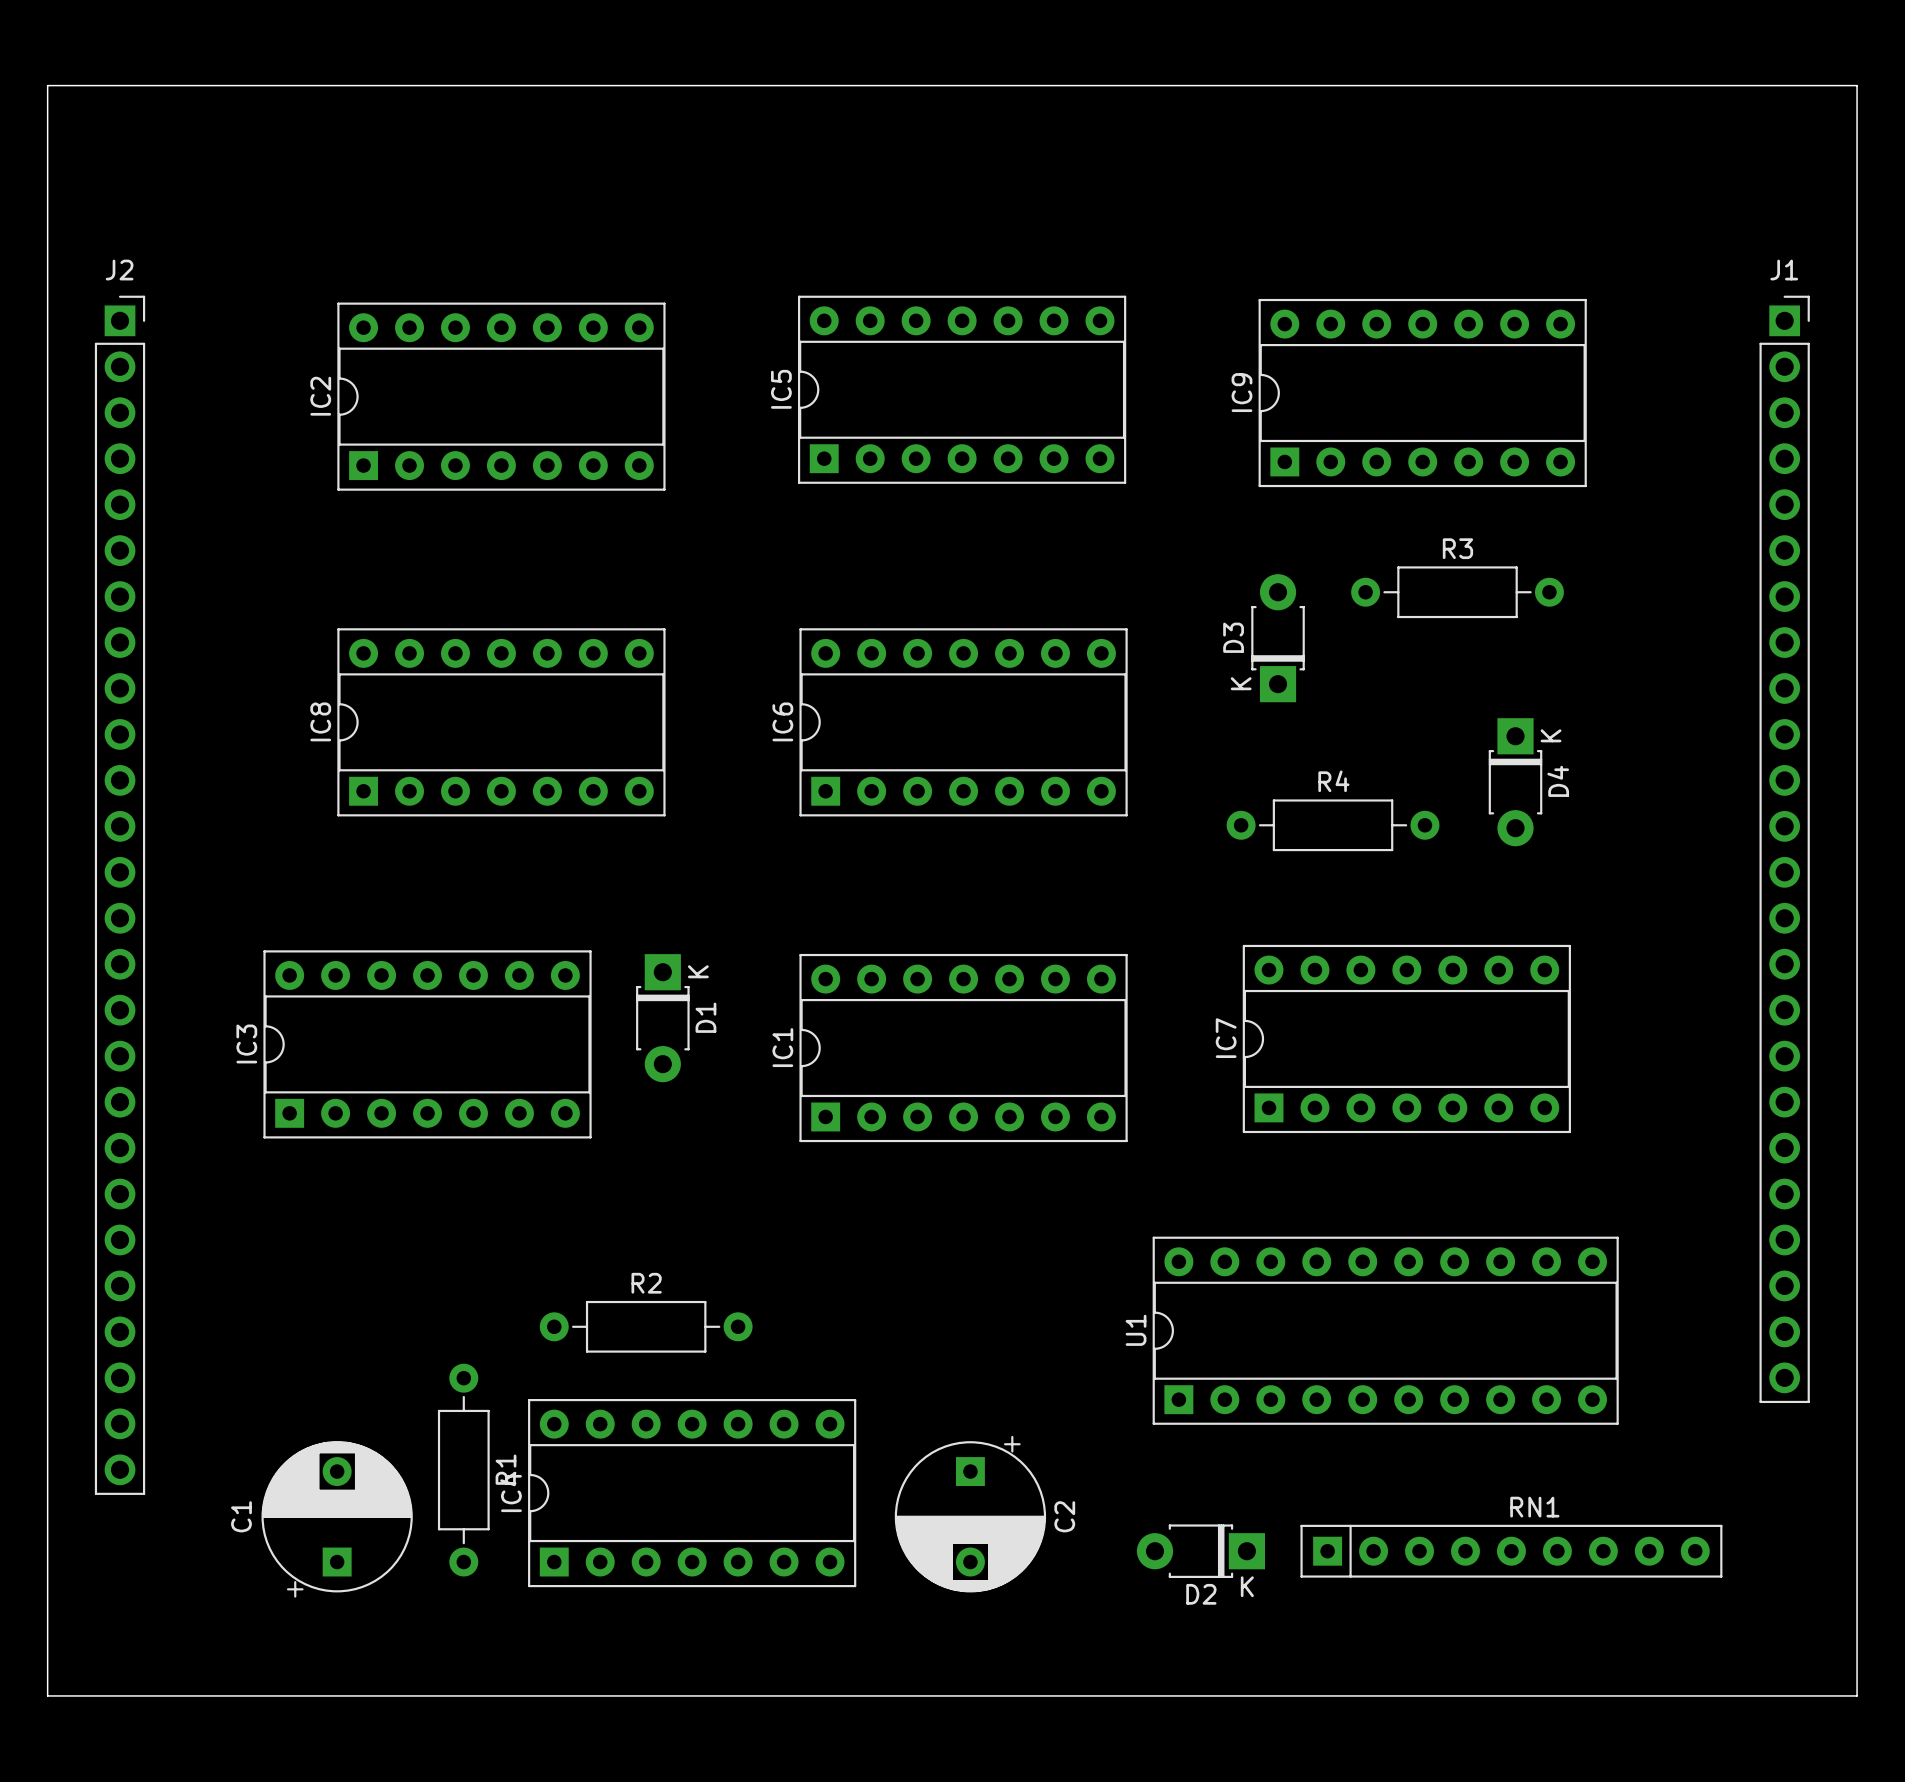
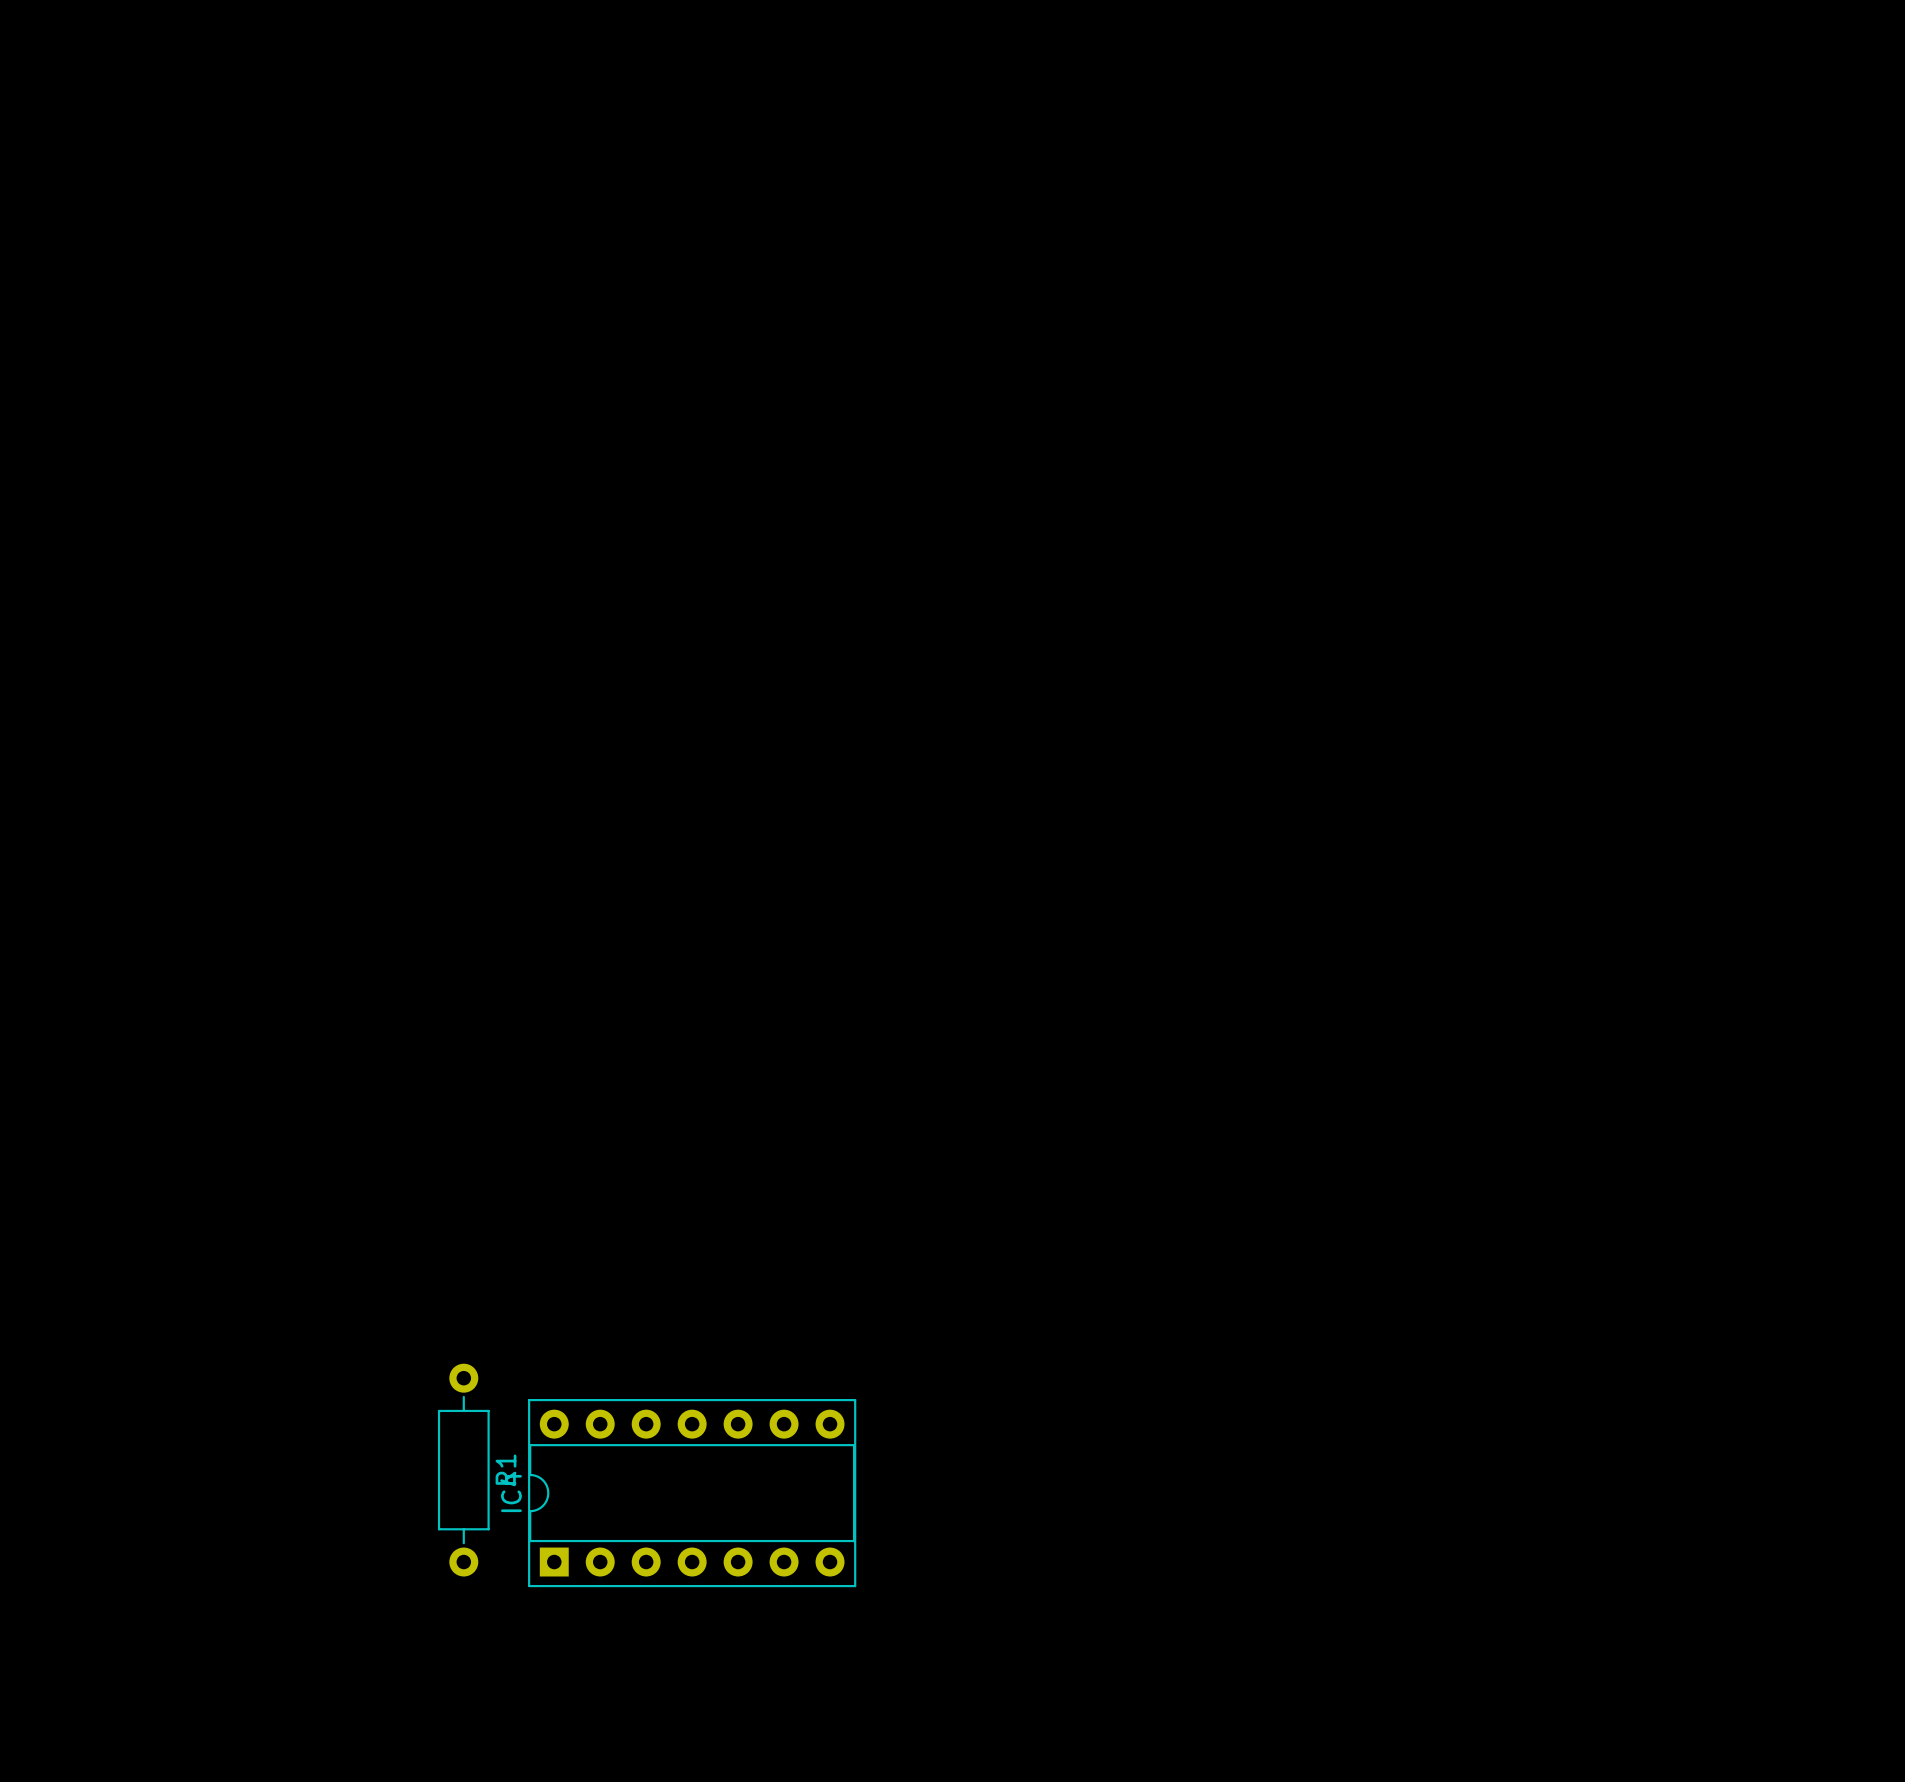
board edge: (47, 85) (1857, 85) (1857, 1695) (47, 1695) (47, 85) -> none
IC5: (962, 389) -> none
IC9: (1422, 393) -> none
IC2: (501, 396) -> none
R3: (1457, 592) -> none
D3: (1278, 638) -> none
IC8: (501, 722) -> none
IC6: (963, 722) -> none
D4: (1515, 782) -> none
R4: (1333, 825) -> none
J1: (1784, 849) -> none
J2: (120, 895) -> none
D1: (662, 1018) -> none
IC7: (1406, 1038) -> none
IC3: (427, 1044) -> none
IC1: (963, 1048) -> none
R2: (646, 1326) -> none
U1: (1385, 1330) -> none
C2: (970, 1514) -> none
C1: (337, 1519) -> none
D2: (1200, 1551) -> none
RN1: (1511, 1551) -> none

